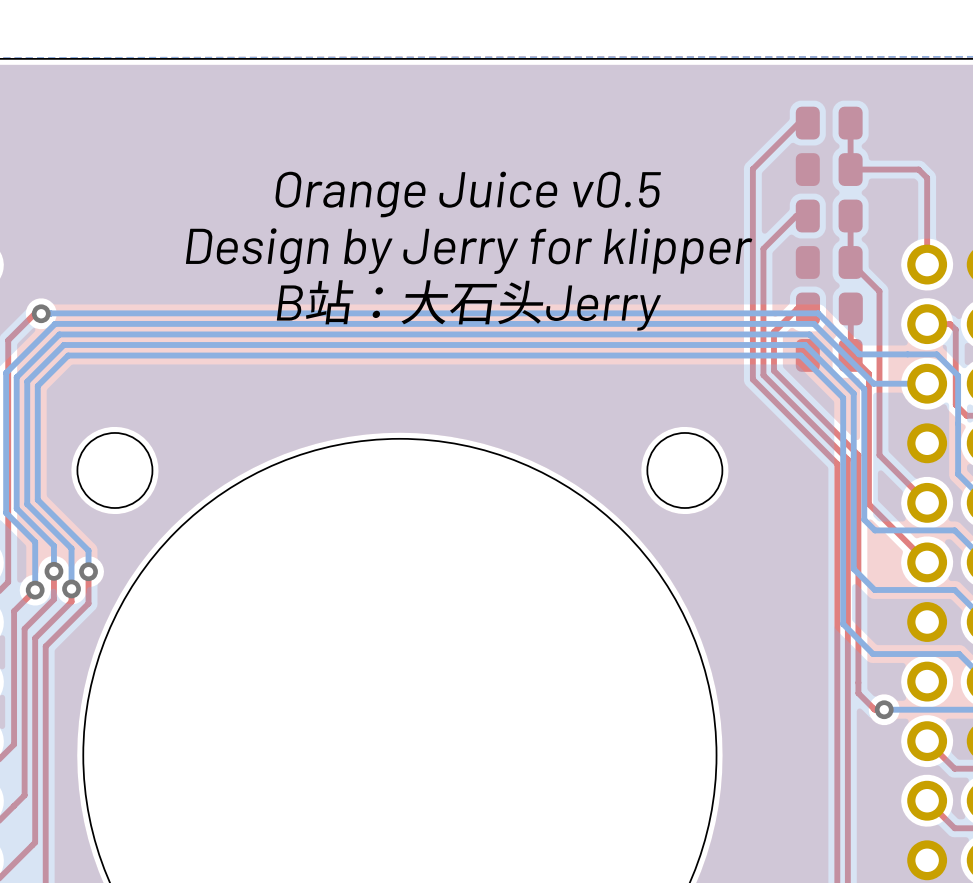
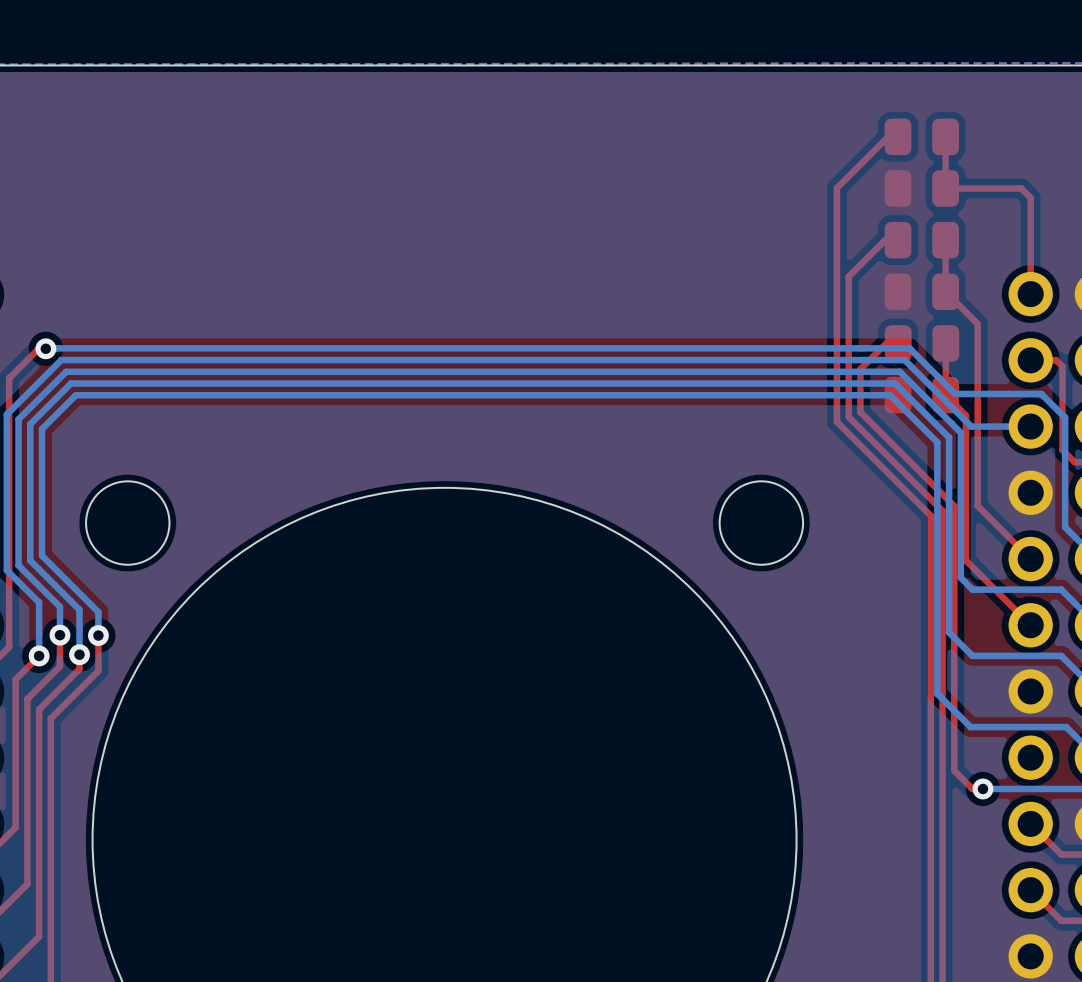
text: Orange Juice v0.5 (468, 194) -> none
text: Design by Jerry for klipper (469, 251) -> none
text: B站：大石头Jerry (468, 305) -> none

